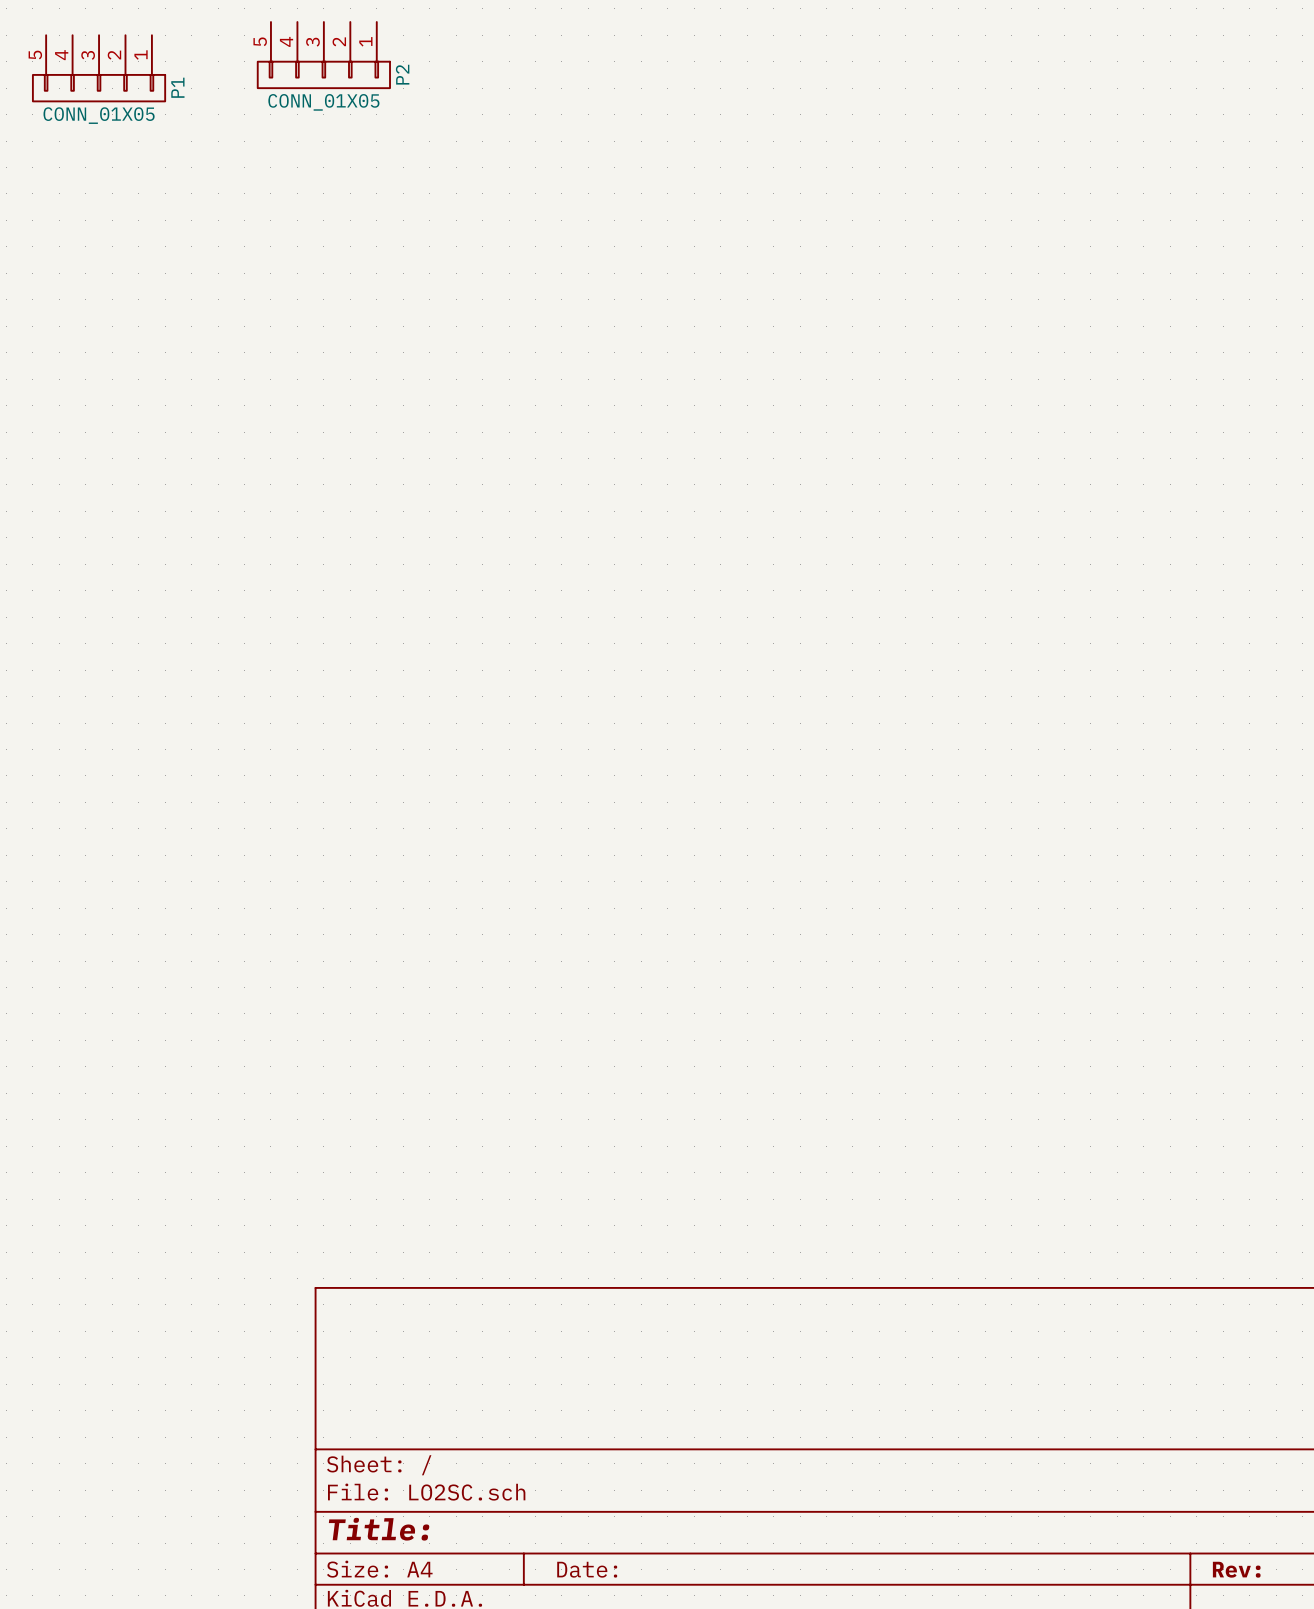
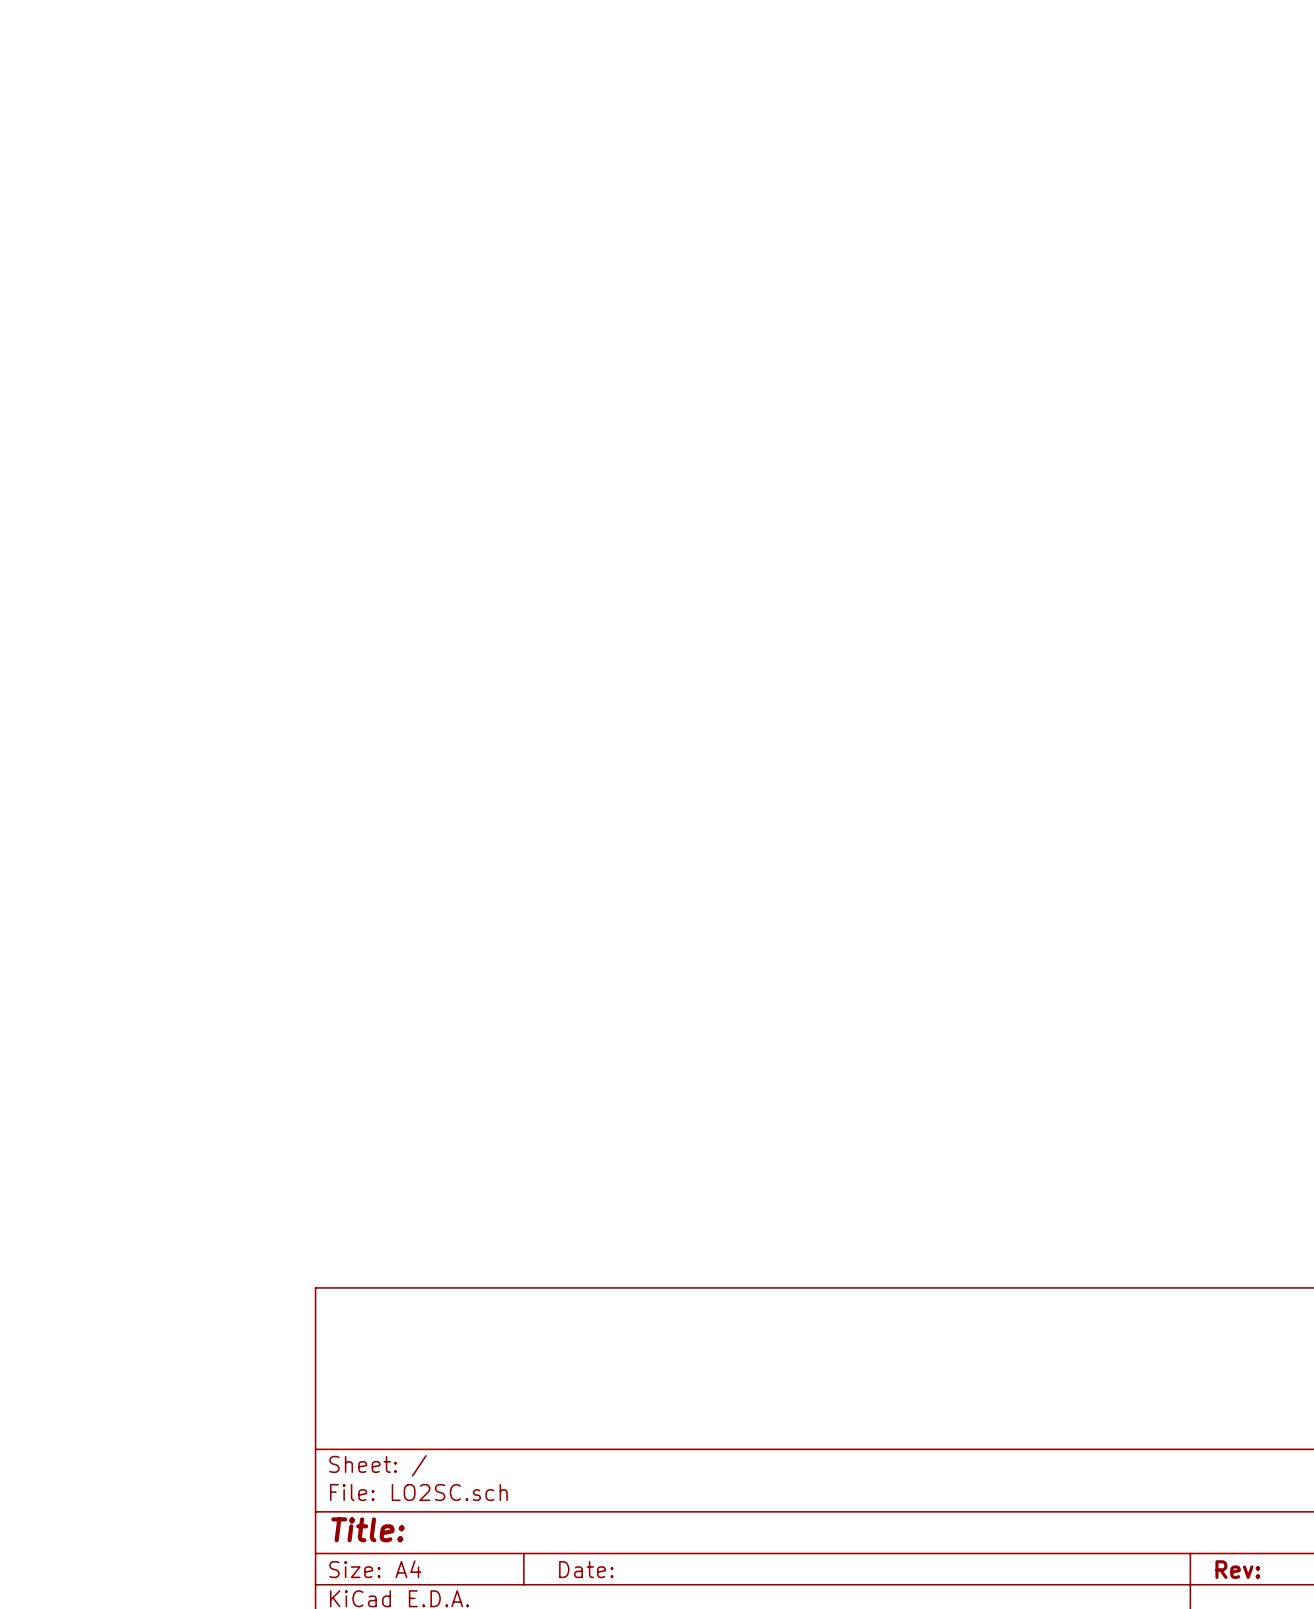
P2: CONN_01X05 (323, 55) -> none
P1: CONN_01X05 (99, 68) -> none

